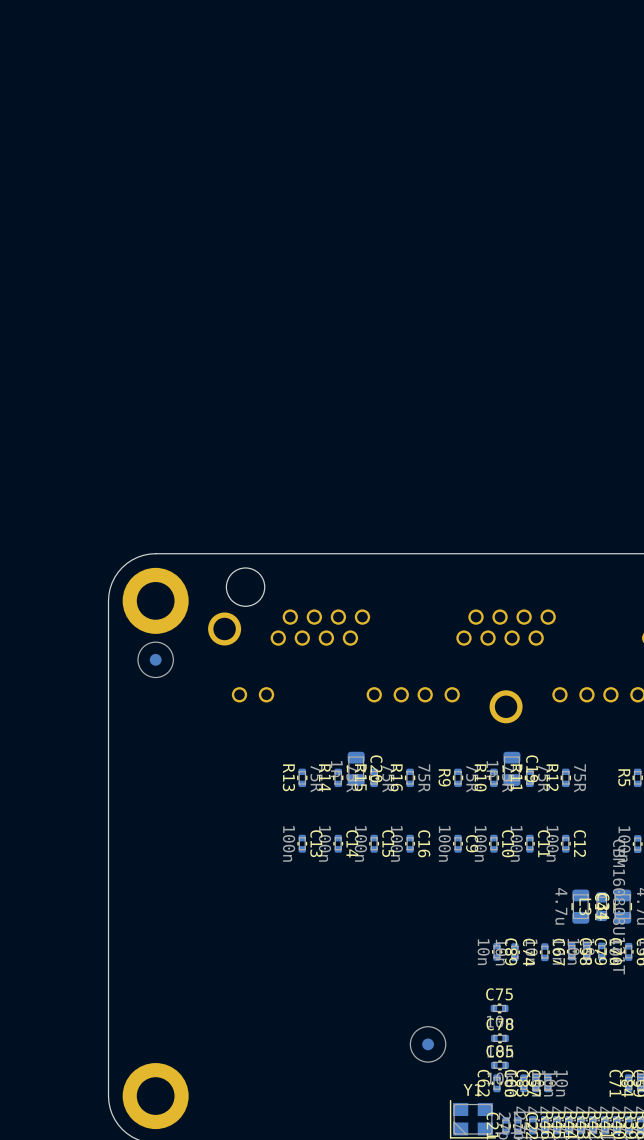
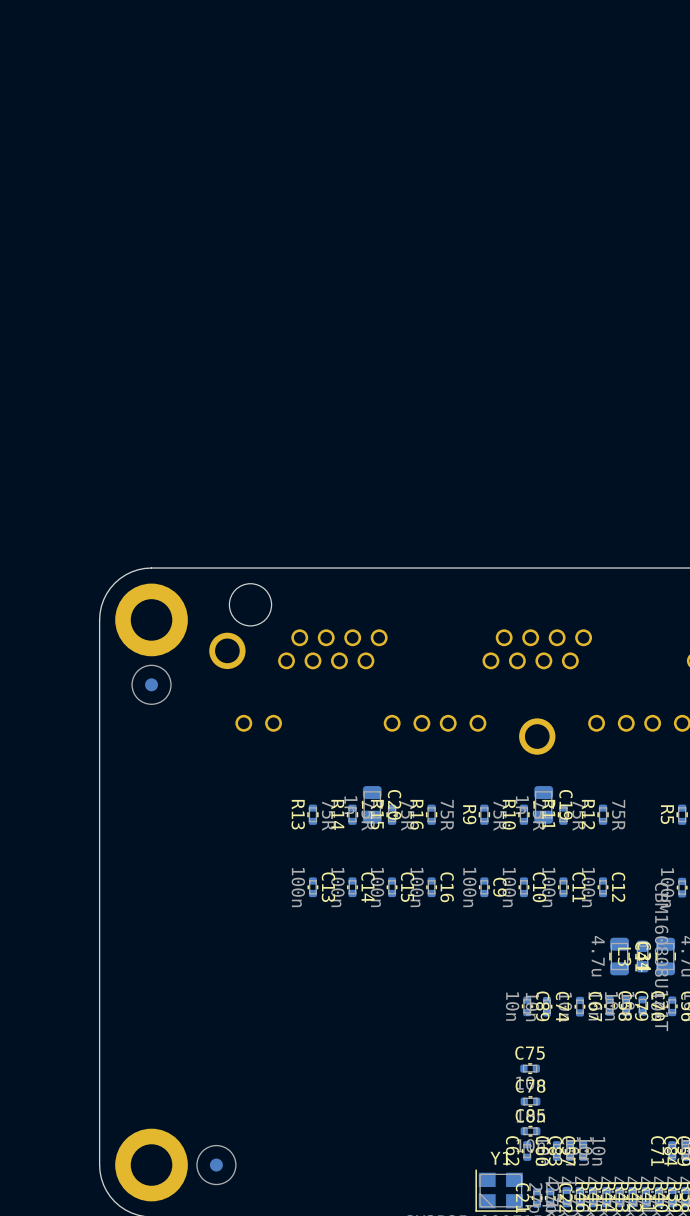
part position: (428, 1044) -> (216, 1165)

